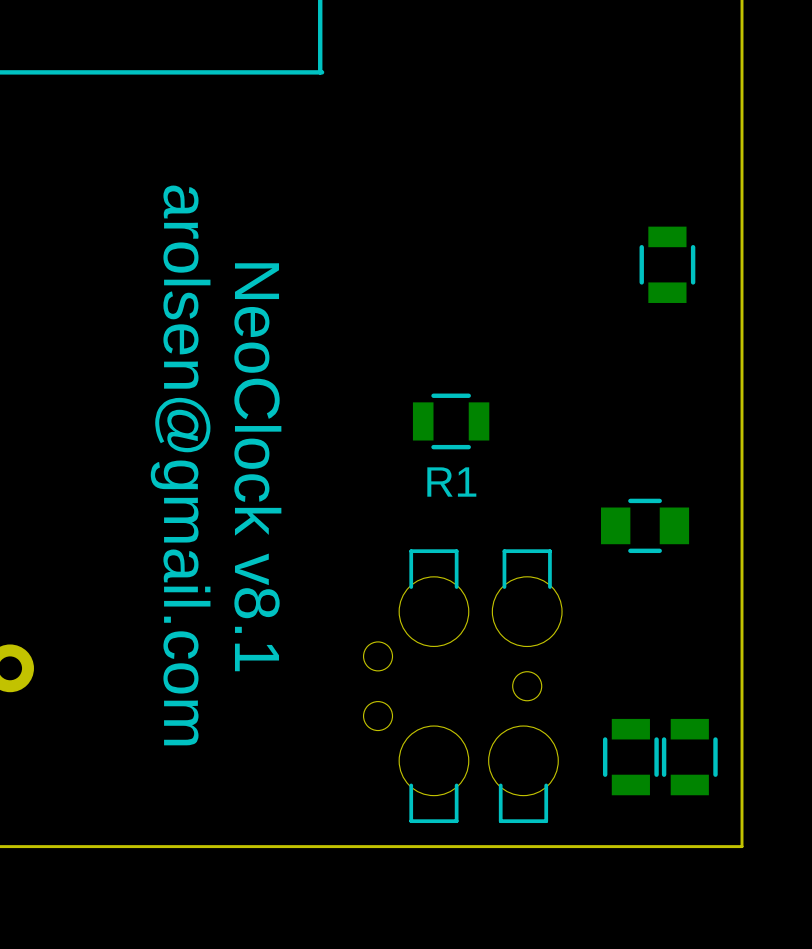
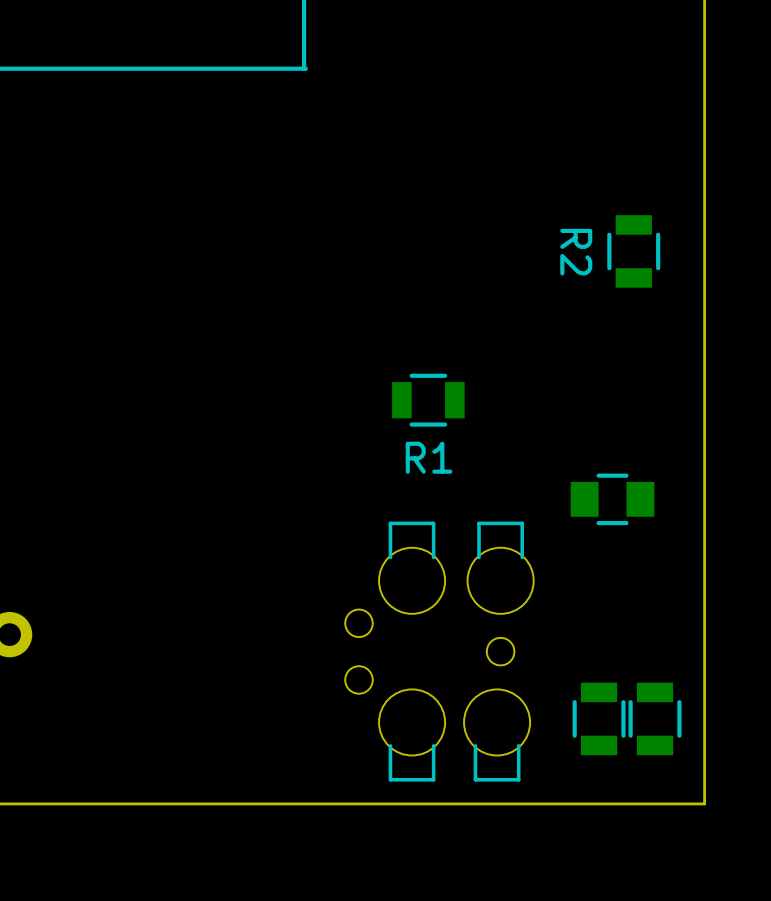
R2 name: none -> R2 (576, 252)
text: arolsen@gmail.com (180, 465) -> none
text: NeoClock v8.1 (257, 467) -> none

